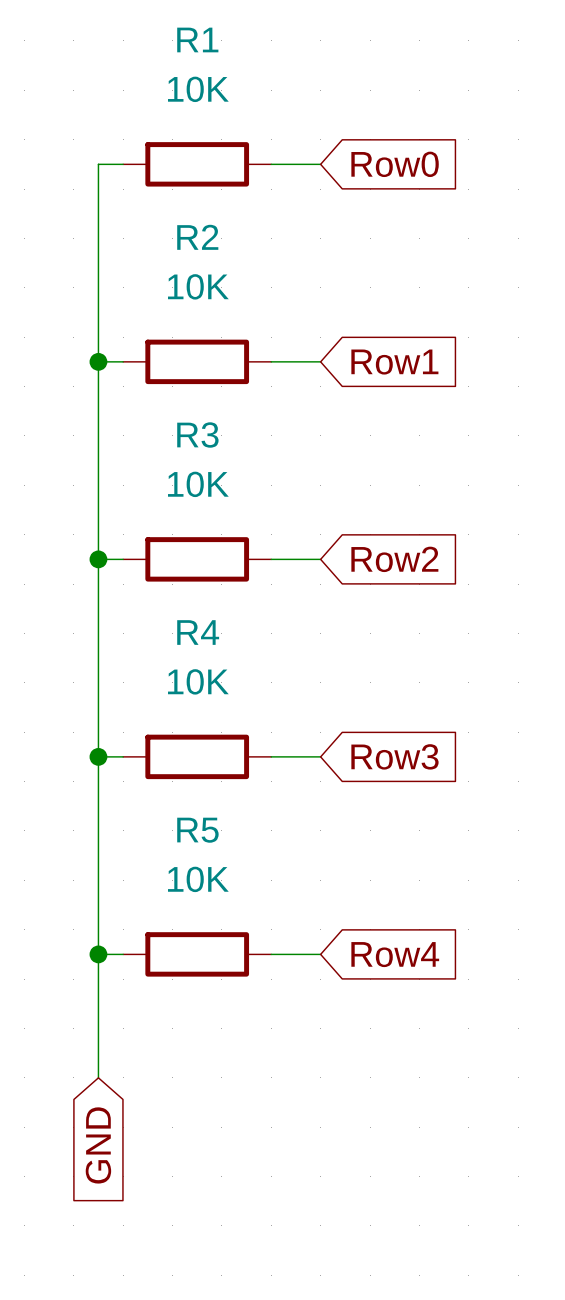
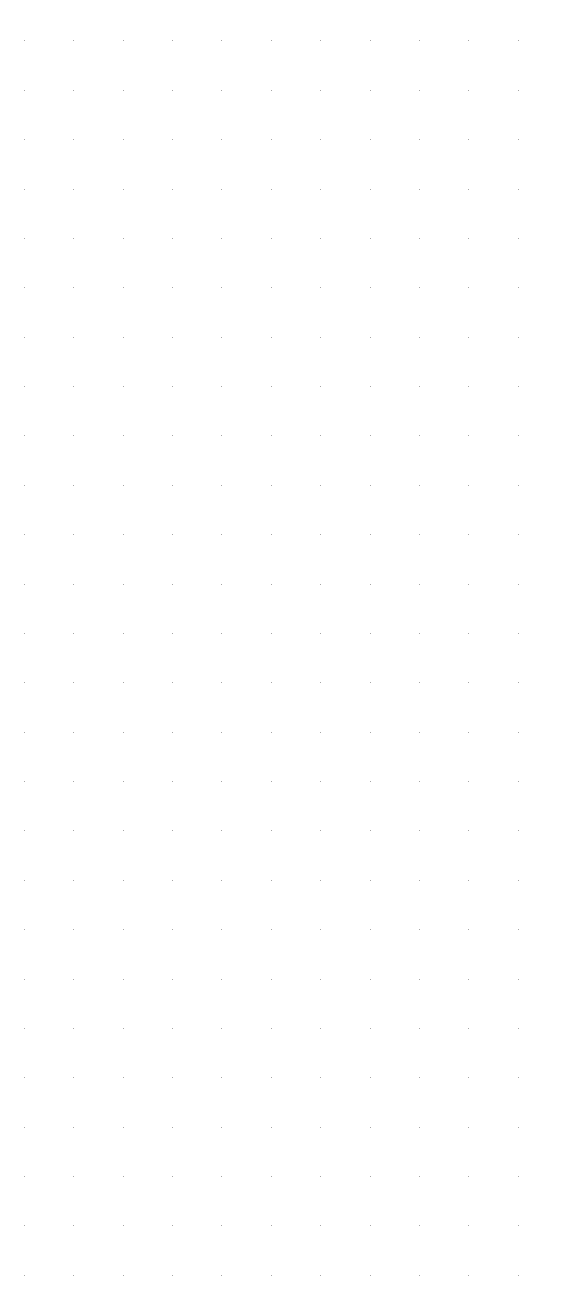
wire: (123, 164) (98, 164) (98, 1077) -> none
R1: 10K (197, 164) -> none
wire: (271, 164) (320, 164) -> none
global label: Row0 (395, 164) -> none
wire: (98, 361) (123, 361) -> none
junction: (98, 361) -> none
R2: 10K (197, 361) -> none
wire: (271, 361) (320, 361) -> none
global label: Row1 (394, 362) -> none
wire: (98, 559) (123, 559) -> none
junction: (98, 559) -> none
R3: 10K (197, 559) -> none
wire: (271, 559) (320, 559) -> none
global label: Row2 (394, 559) -> none
wire: (98, 756) (123, 756) -> none
junction: (98, 756) -> none
R4: 10K (197, 756) -> none
wire: (271, 756) (320, 756) -> none
global label: Row3 (394, 756) -> none
wire: (98, 954) (123, 954) -> none
junction: (98, 954) -> none
R5: 10K (197, 954) -> none
wire: (271, 954) (320, 954) -> none
global label: Row4 (395, 954) -> none
global label: GND (98, 1145) -> none

